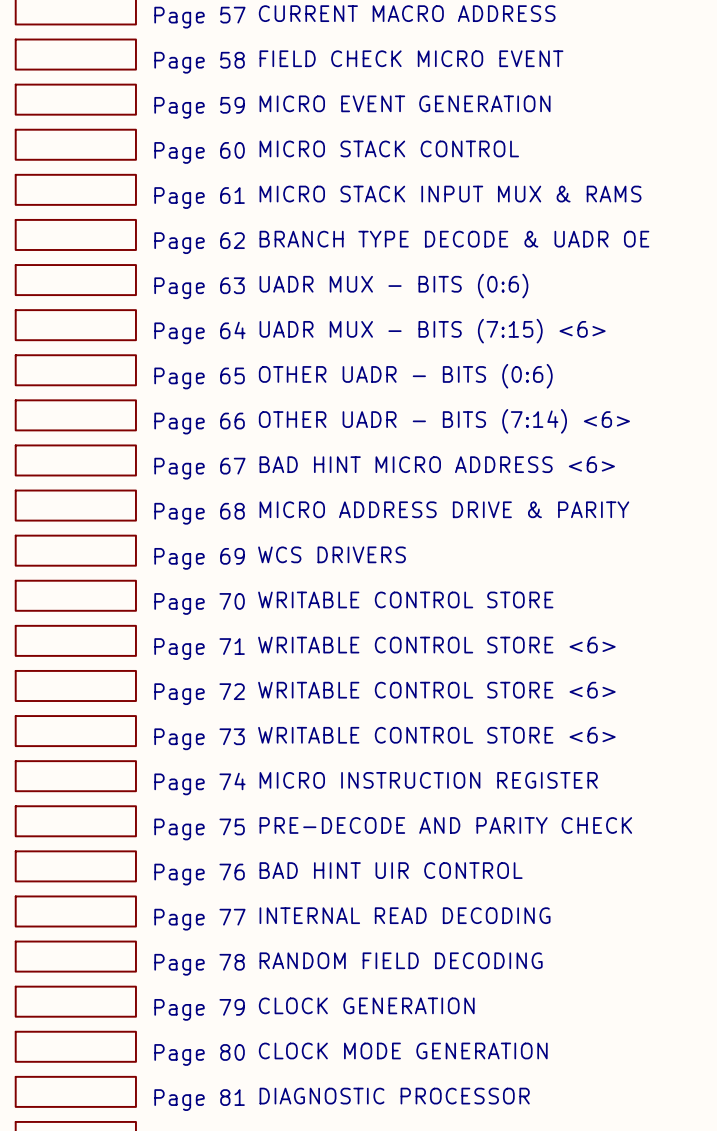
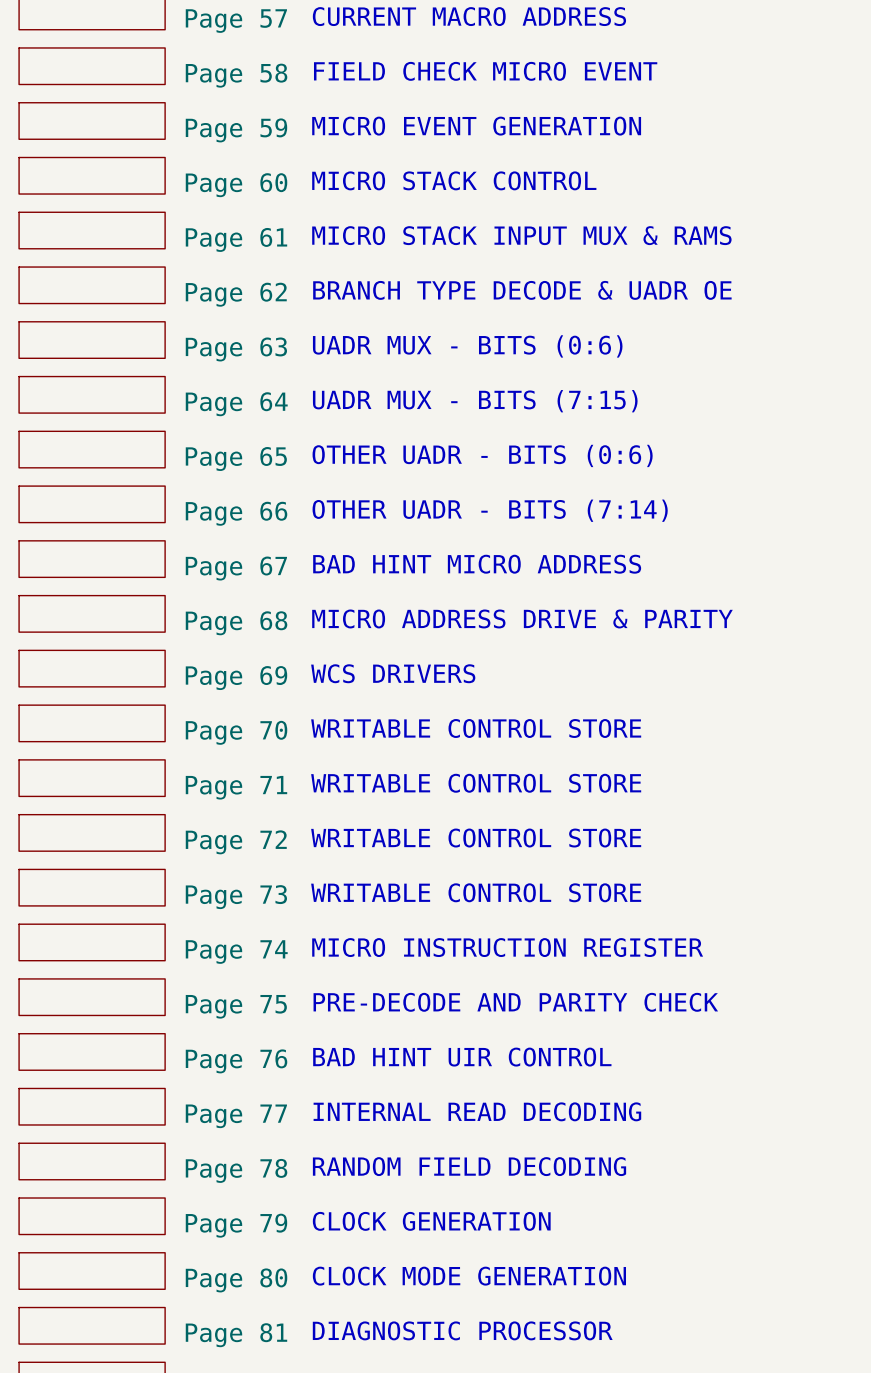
text: UADR MUX - BITS (7:15) <6> (432, 331) -> UADR MUX - BITS (7:15) (475, 401)
text: OTHER UADR - BITS (7:14) <6> (444, 421) -> OTHER UADR - BITS (7:14) (490, 510)
text: BAD HINT MICRO ADDRESS <6> (437, 464) -> BAD HINT MICRO ADDRESS (477, 564)
text: WRITABLE CONTROL STORE <6> (436, 645) -> WRITABLE CONTROL STORE (476, 783)
text: WRITABLE CONTROL STORE <6> (436, 690) -> WRITABLE CONTROL STORE (476, 838)
text: WRITABLE CONTROL STORE <6> (436, 735) -> WRITABLE CONTROL STORE (476, 892)

